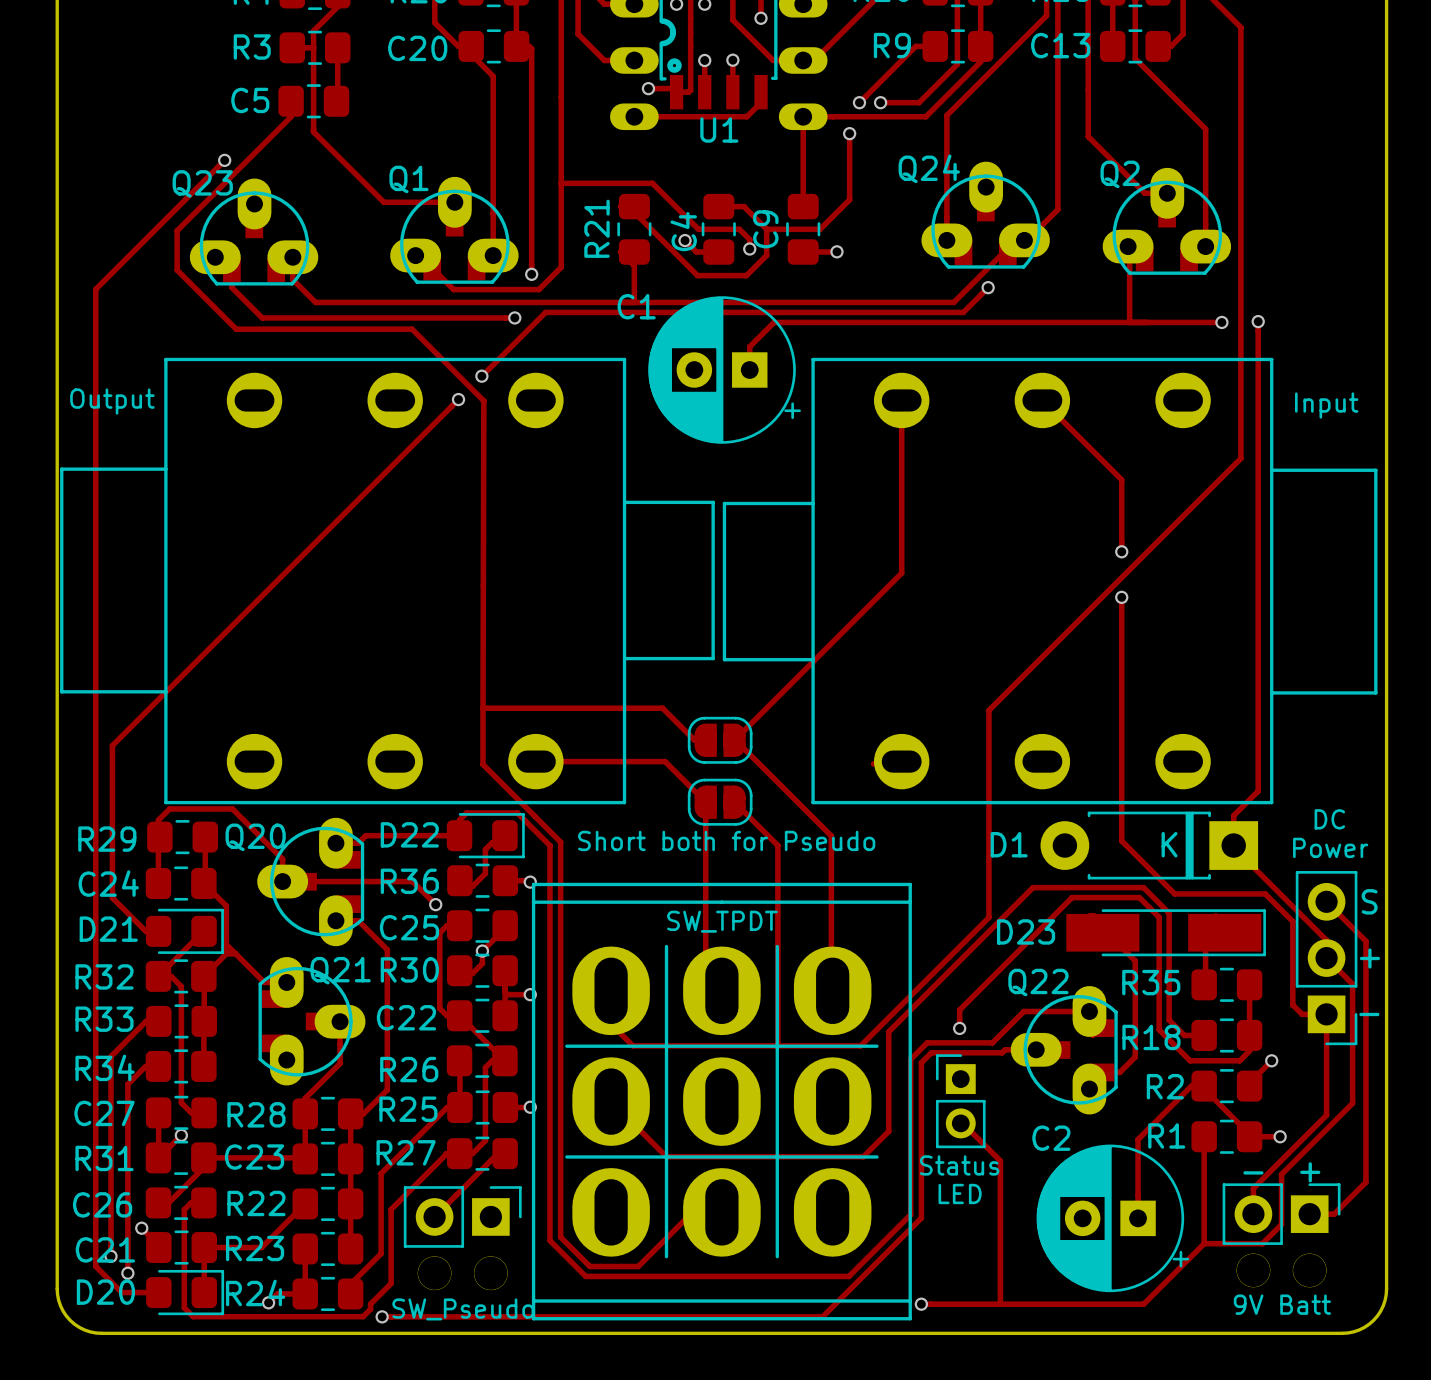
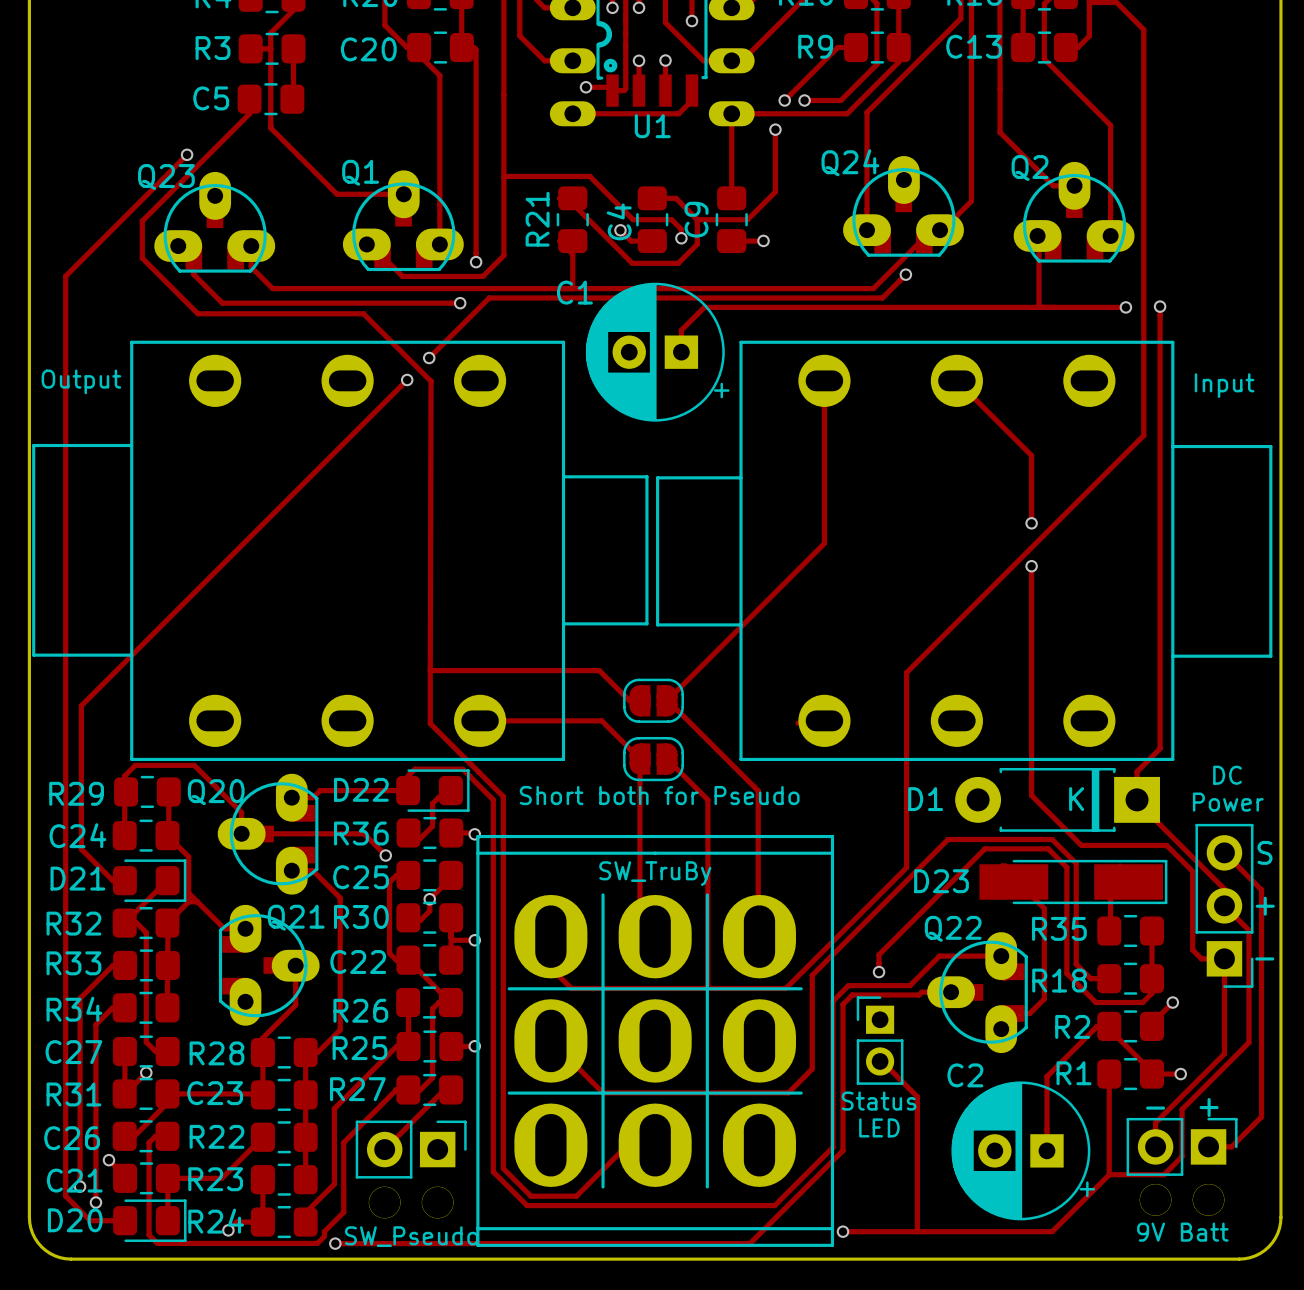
part value: SW_TPDT (722, 921) -> SW_TruBy (655, 873)

